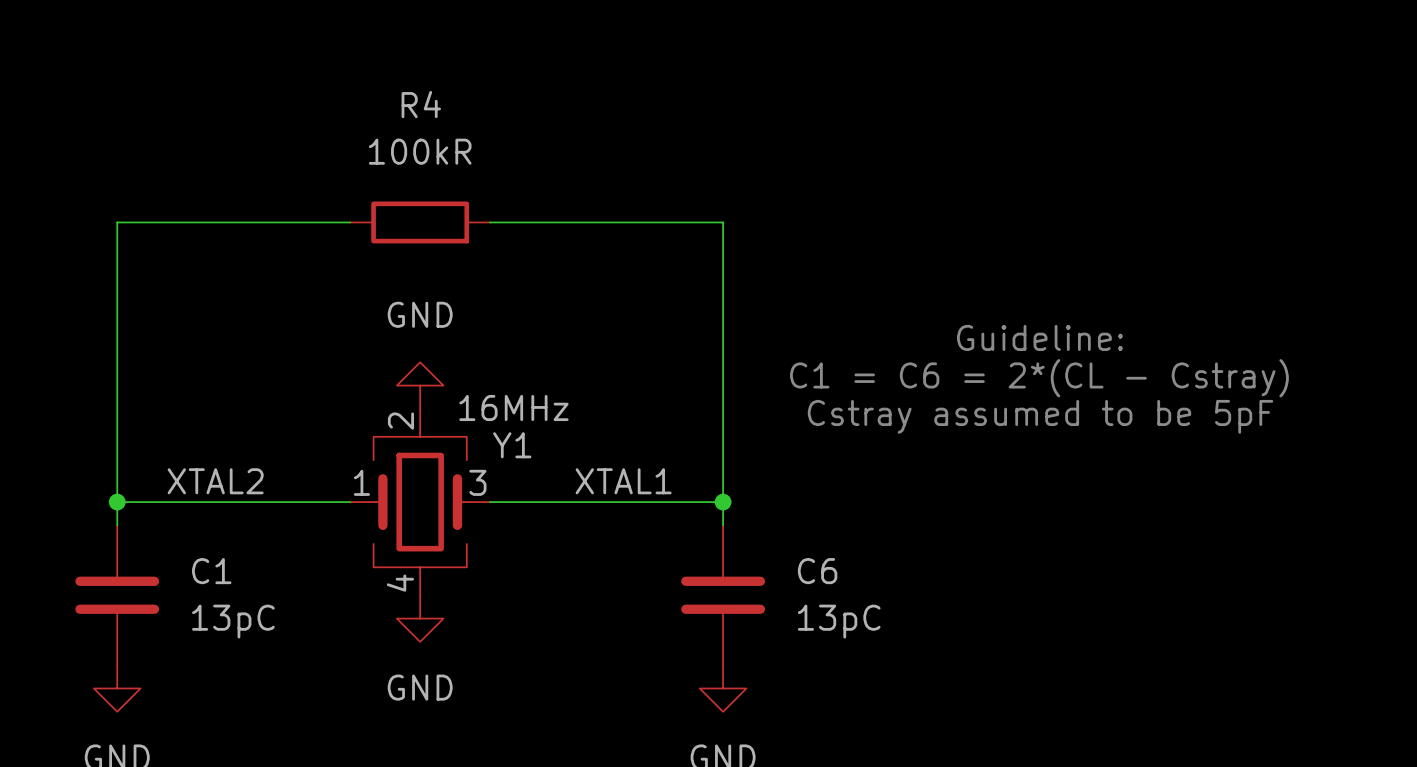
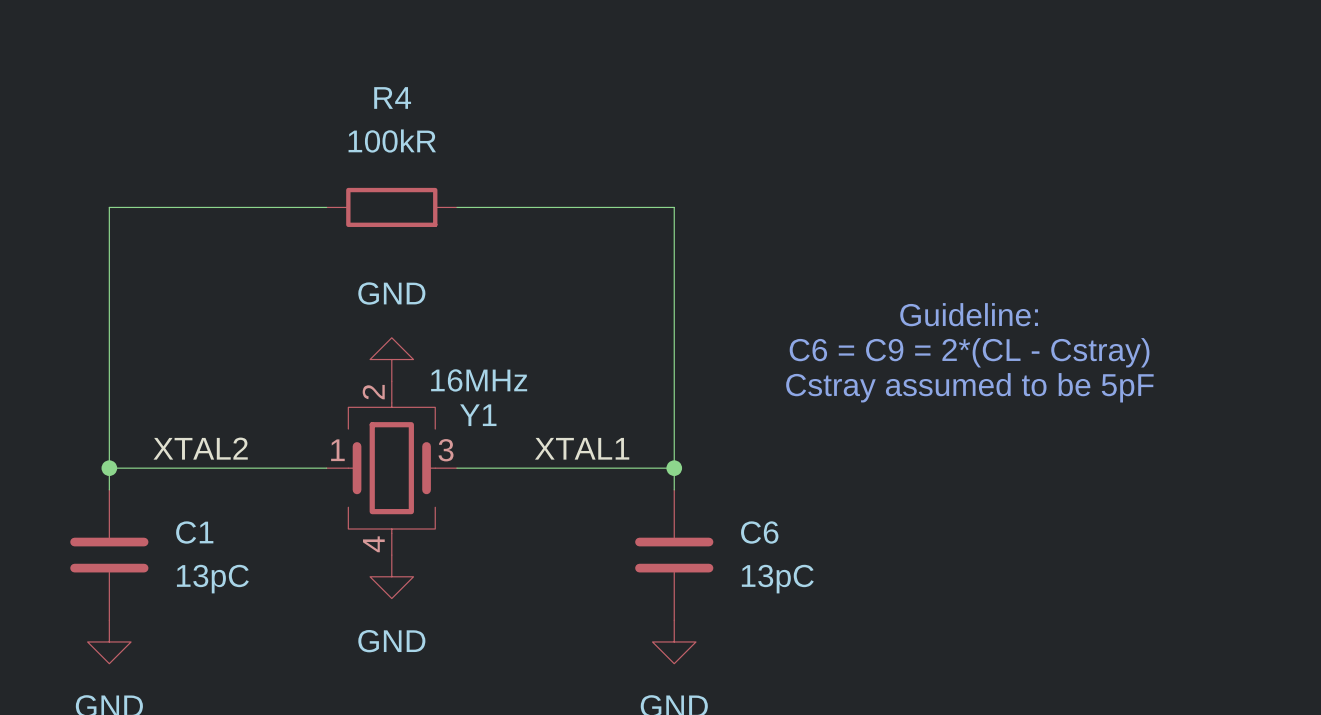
text: C1 = C6 = 2*(CL - Cstray) (1039, 378) -> C6 = C9 = 2*(CL - Cstray) (969, 352)

